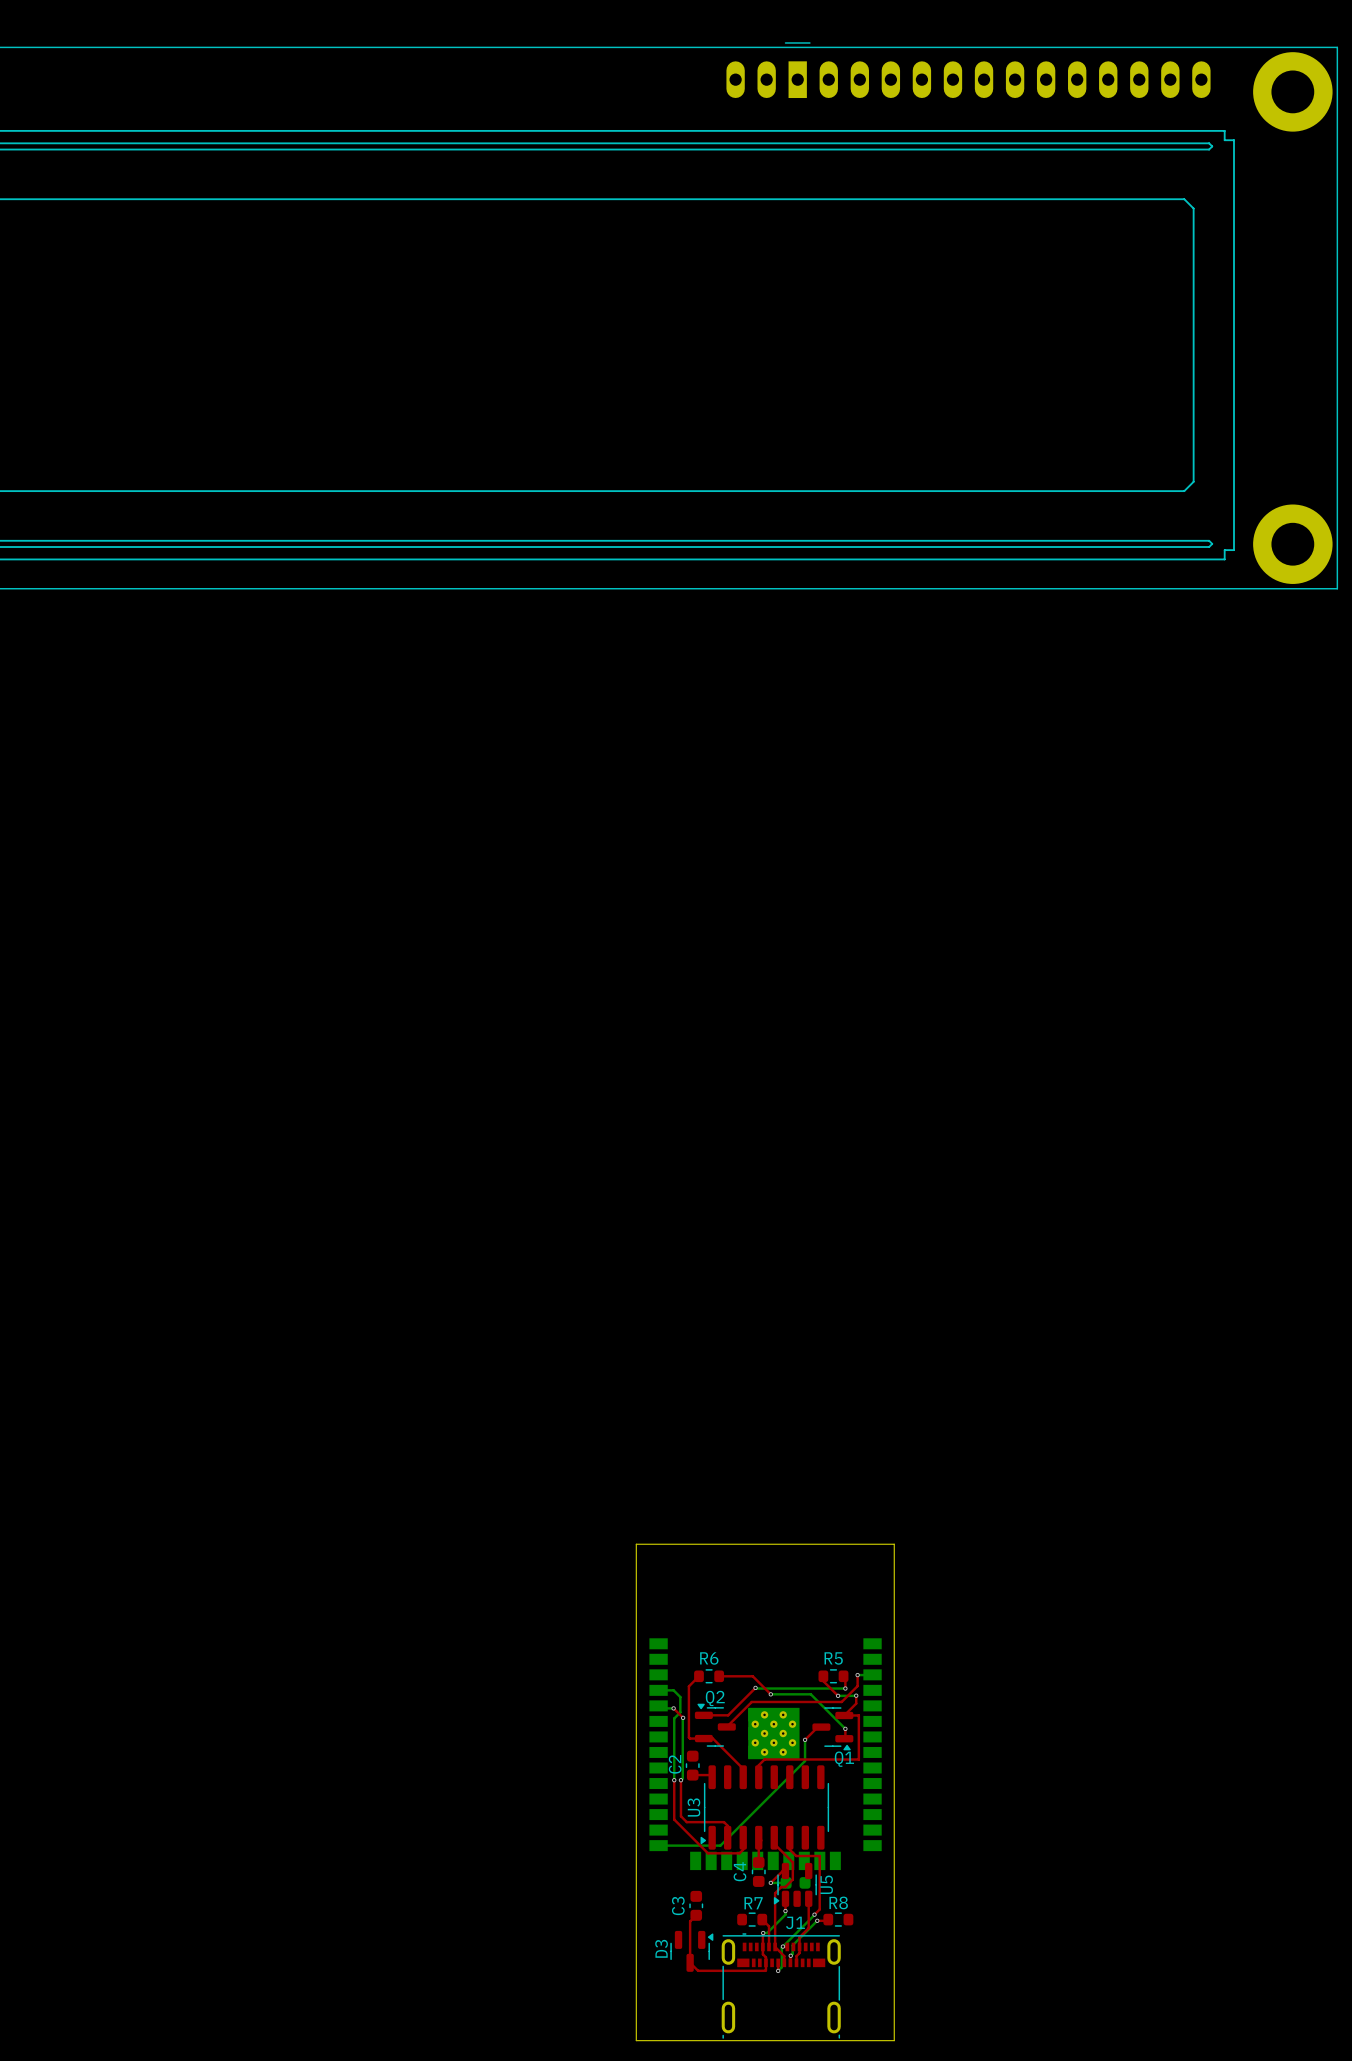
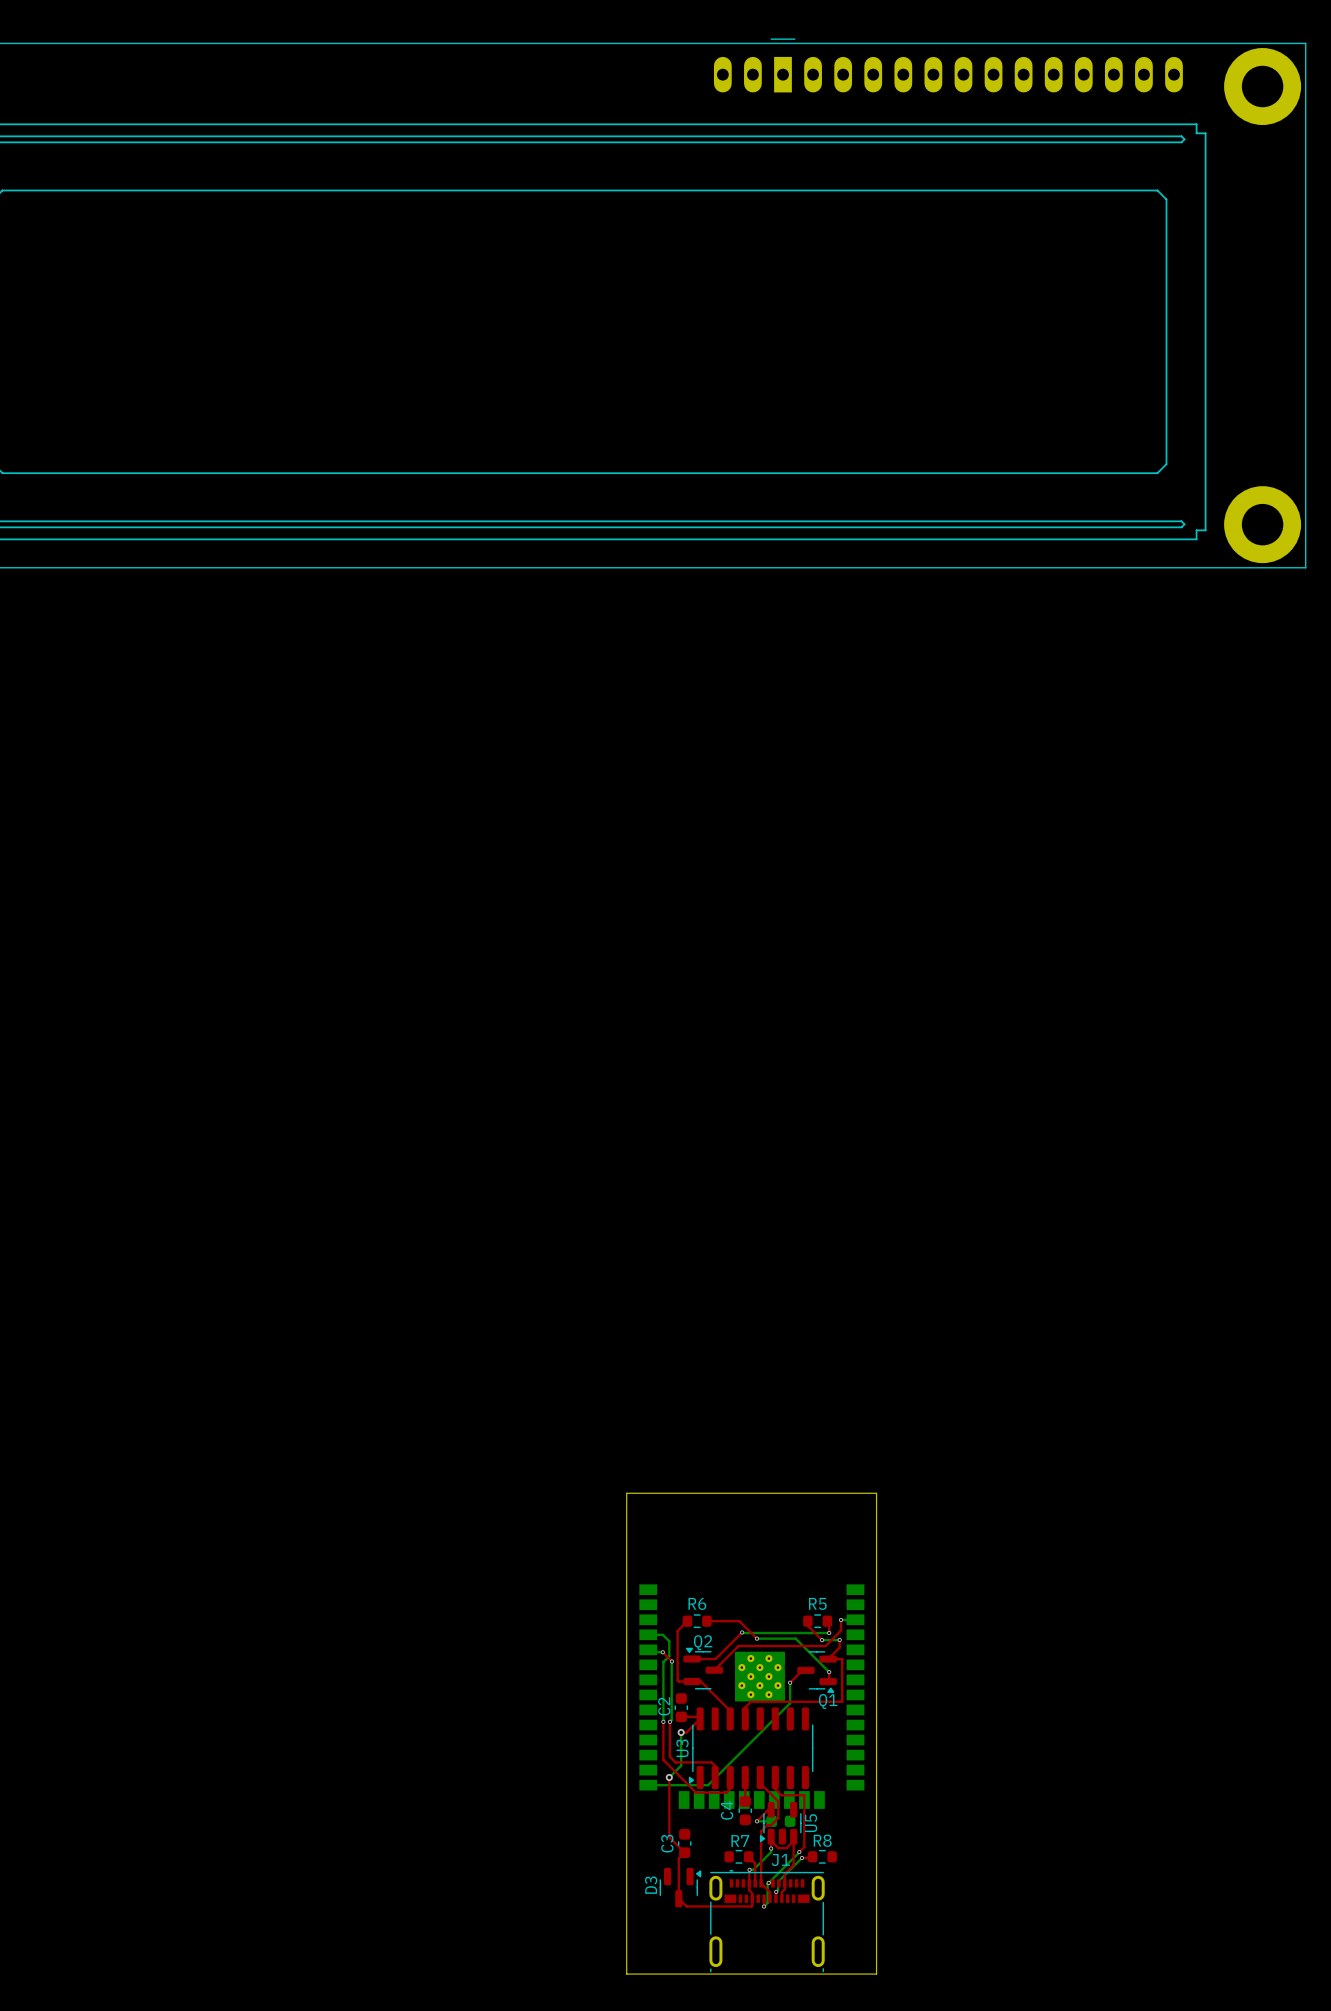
top track: none -> (700, 1718) (686, 1732) (681, 1732)
bottom track: none -> (681, 1732) (681, 1765) (669, 1777)
via: none -> (681, 1732)
top track: none -> (669, 1777) (669, 1837) (684, 1852)
via: none -> (669, 1777)
top track: none -> (771, 1840) (778, 1848) (786, 1848) (793, 1840)

